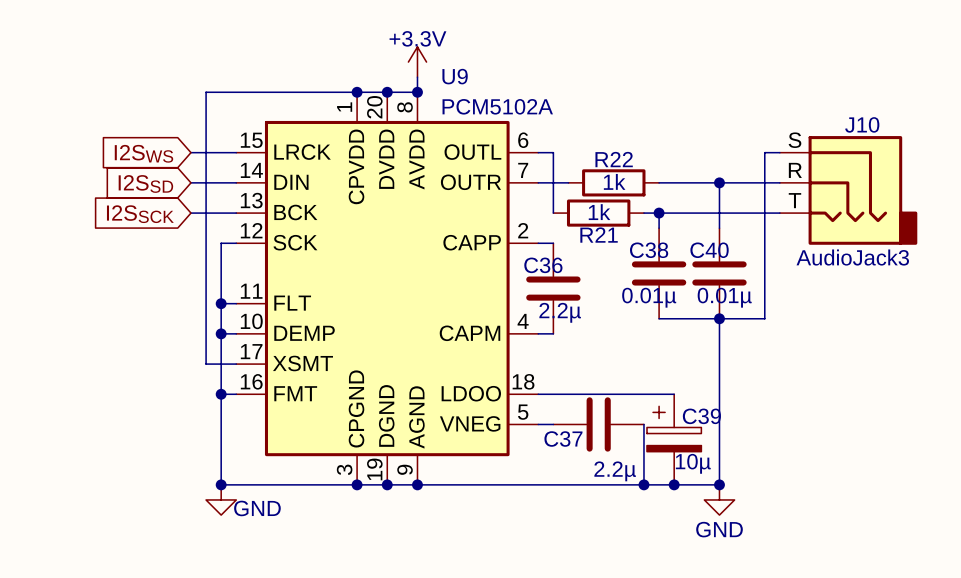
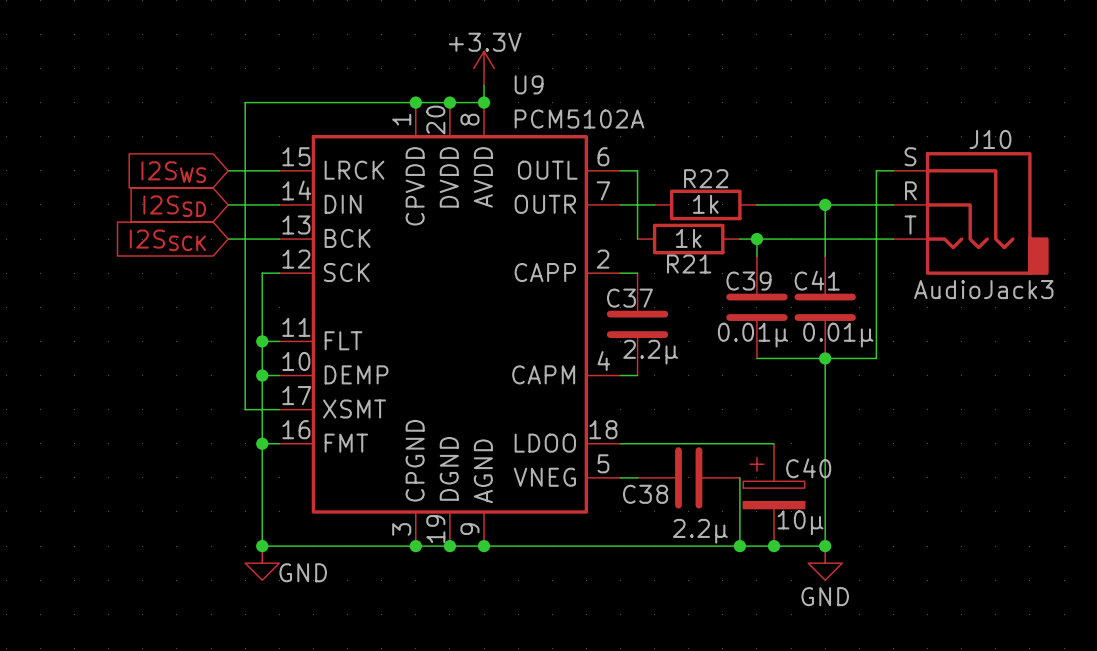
C38 name: C38 (649, 250) -> C39 (748, 281)
C40 name: C40 (709, 250) -> C41 (817, 280)
C36 name: C36 (543, 265) -> C37 (629, 298)
C39 name: C39 (701, 416) -> C40 (808, 468)
C37 name: C37 (563, 439) -> C38 (645, 494)

